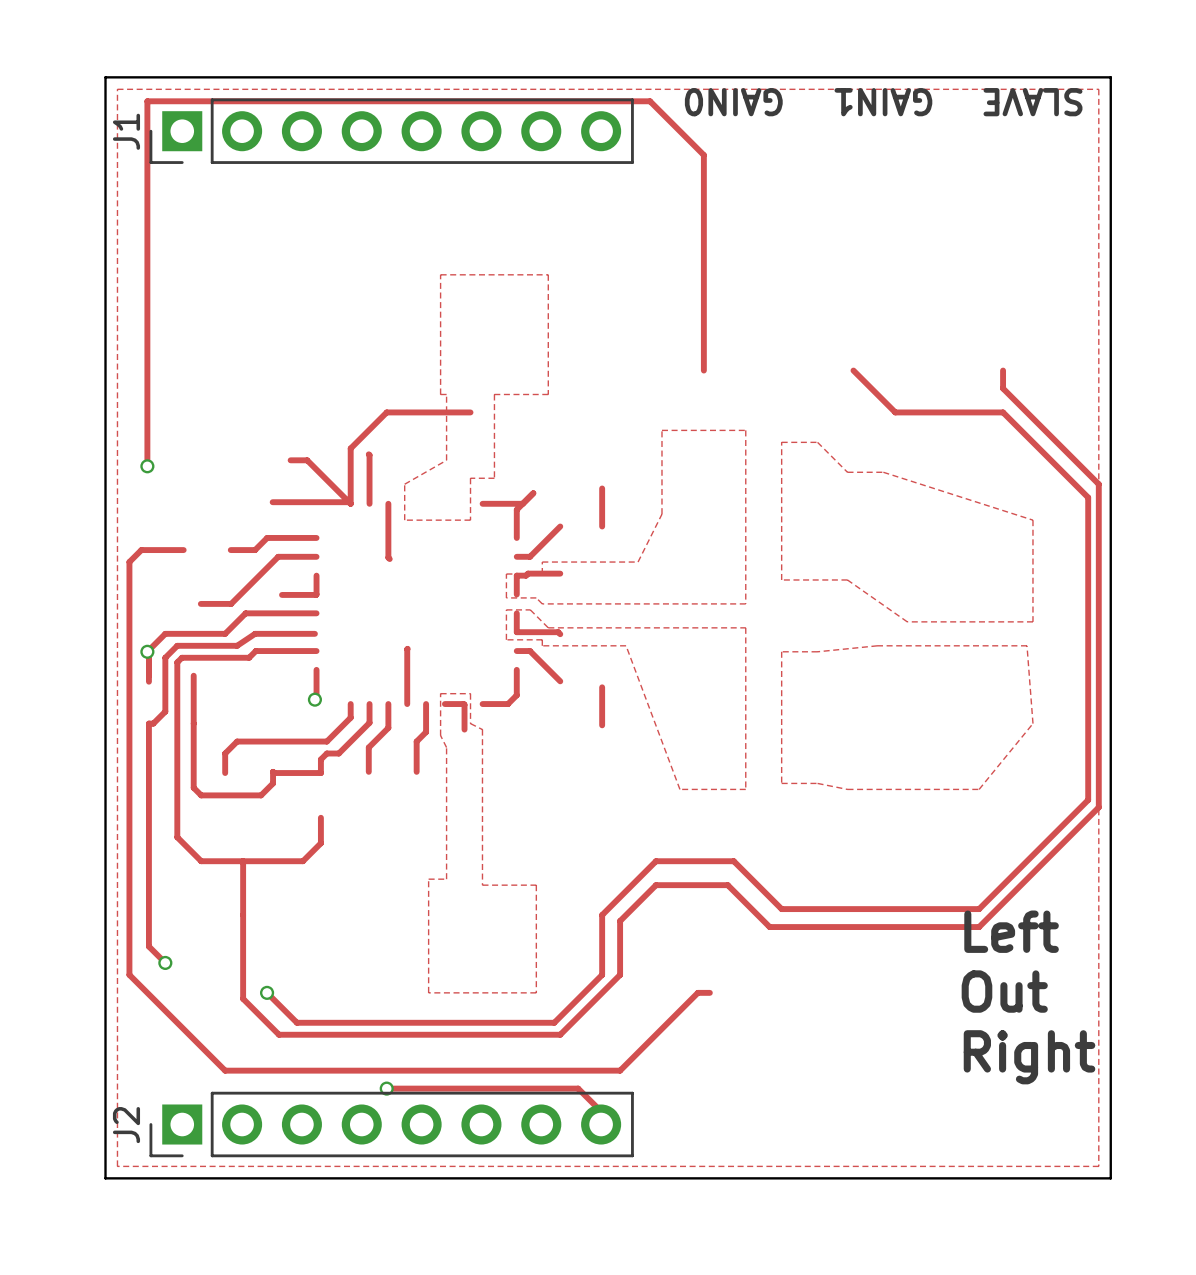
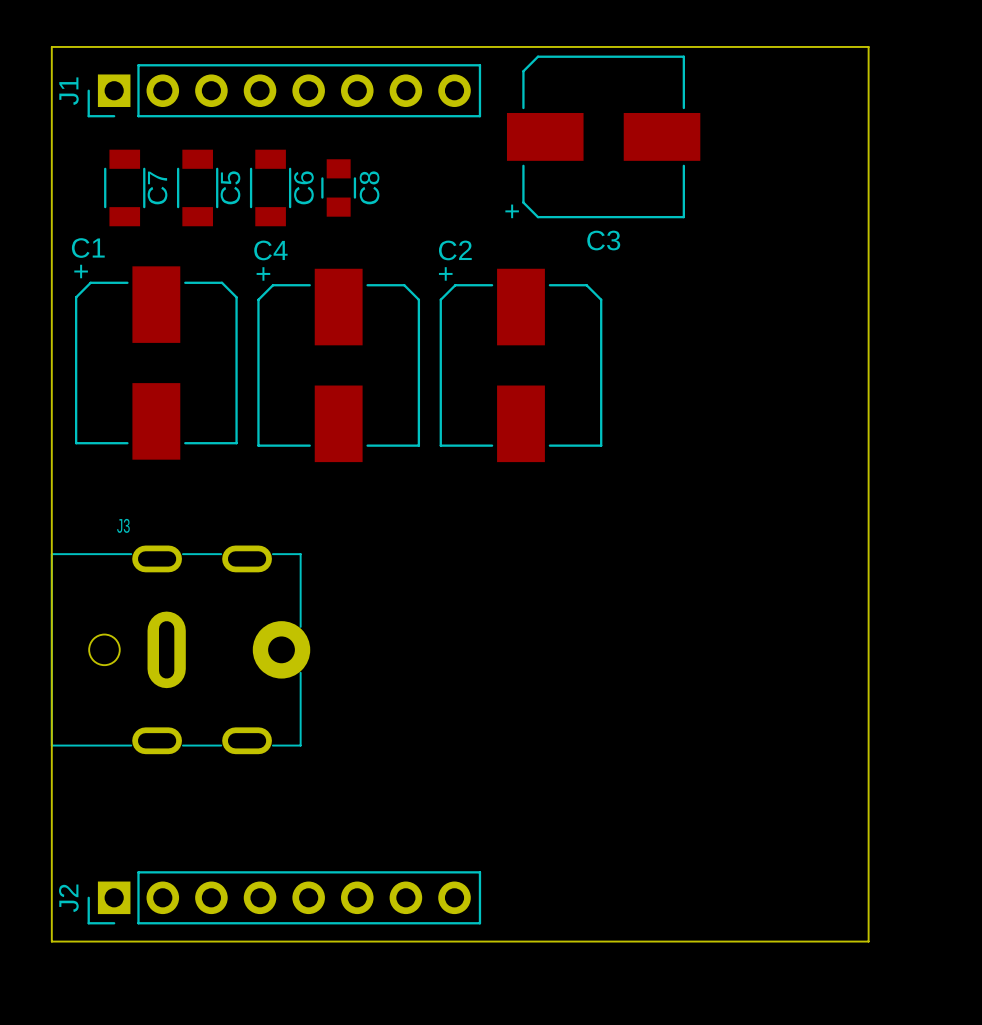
zone outline: (117, 89) (1098, 89) (1098, 1166) (117, 1166) (117, 89) -> none
text: GAIN0 (733, 102) -> none
text: GAIN1 (883, 102) -> none
text: SLAVE (1032, 102) -> none
C3: none -> (603, 136)
C7: none -> (124, 187)
C5: none -> (197, 187)
C6: none -> (270, 187)
C8: none -> (338, 187)
zone outline: (440, 274) (440, 394) (446, 394) (446, 460) (404, 484) (404, 520) (470, 520) (470, 478) (494, 478) (494, 394) (548, 394) (548, 274) (440, 274) -> none
track: (703, 370) (703, 155) (650, 101) (147, 101) (147, 466) -> none
track: (853, 370) (895, 412) (1003, 412) (1088, 497) (1088, 800) (979, 909) (781, 909) (733, 861) (656, 861) (602, 915) (602, 974) (554, 1022) (296, 1022) (267, 992) -> none
track: (1003, 370) (1003, 388) (1098, 484) (1098, 807) (979, 927) (769, 927) (727, 885) (656, 885) (620, 921) (620, 974) (560, 1034) (279, 1034) (243, 998) (243, 861) -> none
track: (470, 412) (386, 412) (350, 448) (350, 503) (307, 460) (290, 460) -> none
zone outline: (661, 430) (661, 514) (638, 562) (542, 562) (542, 574) (506, 574) (506, 597) (536, 597) (542, 603) (745, 603) (745, 430) (661, 430) -> none
zone outline: (781, 442) (817, 442) (847, 472) (883, 472) (1032, 520) (1032, 621) (907, 621) (847, 579) (781, 579) (781, 442) -> none
track: (368, 454) (369, 503) -> none
via: (147, 466) -> none
C1: none -> (156, 363)
C4: none -> (338, 365)
C2: none -> (520, 365)
track: (602, 488) (602, 526) -> none
track: (533, 493) (516, 509) (516, 537) -> none
track: (272, 502) (349, 502) -> none
track: (388, 503) (389, 559) -> none
track: (482, 503) (522, 503) -> none
track: (560, 526) (529, 556) (516, 556) -> none
track: (316, 537) (267, 537) (255, 550) (230, 550) -> none
track: (183, 550) (141, 550) (129, 562) (129, 974) (225, 1070) (620, 1070) (697, 992) (709, 992) -> none
track: (316, 556) (278, 556) (231, 603) (200, 603) -> none
track: (560, 573) (516, 575) (516, 594) -> none
track: (316, 575) (316, 594) (282, 594) -> none
zone outline: (506, 609) (506, 639) (542, 639) (542, 645) (626, 645) (679, 789) (745, 789) (745, 627) (548, 627) (530, 609) (506, 609) -> none
track: (316, 613) (245, 613) (225, 633) (165, 633) (148, 650) (148, 681) -> none
track: (516, 613) (516, 632) (558, 632) (560, 634) -> none
track: (314, 633) (255, 633) (237, 645) (177, 645) (165, 657) (165, 711) (153, 723) (148, 723) (148, 946) (165, 962) -> none
zone outline: (877, 645) (1026, 645) (1032, 723) (979, 789) (847, 789) (817, 783) (781, 783) (781, 651) (817, 651) (877, 645) -> none
track: (407, 648) (407, 704) -> none
via: (147, 651) -> none
track: (316, 651) (255, 651) (249, 657) (181, 657) (177, 662) (177, 837) (201, 861) (302, 861) (320, 843) (320, 817) -> none
track: (516, 651) (529, 651) (560, 681) -> none
track: (316, 669) (316, 698) (314, 699) -> none
track: (516, 669) (516, 695) (508, 704) (482, 704) -> none
track: (193, 675) (193, 787) (201, 795) (261, 795) (273, 783) (273, 771) (320, 773) (320, 759) (326, 753) (338, 753) (369, 722) (369, 704) -> none
track: (602, 687) (602, 725) -> none
zone outline: (440, 693) (440, 735) (446, 747) (446, 879) (428, 879) (428, 992) (536, 992) (536, 885) (482, 885) (482, 729) (470, 723) (470, 693) (440, 693) -> none
via: (314, 699) -> none
track: (350, 704) (350, 717) (326, 741) (237, 741) (225, 753) (225, 773) -> none
track: (388, 704) (388, 727) (368, 747) (368, 771) -> none
track: (426, 704) (426, 732) (416, 741) (416, 771) -> none
track: (444, 704) (464, 704) (464, 729) -> none
J3: none -> (180, 649)
text: Left (1011, 931) -> none
via: (165, 962) -> none
text: Out (1004, 991) -> none
via: (267, 992) -> none
text: Right (1029, 1057) -> none
track: (386, 1088) (578, 1088) (601, 1111) -> none
via: (386, 1088) -> none

